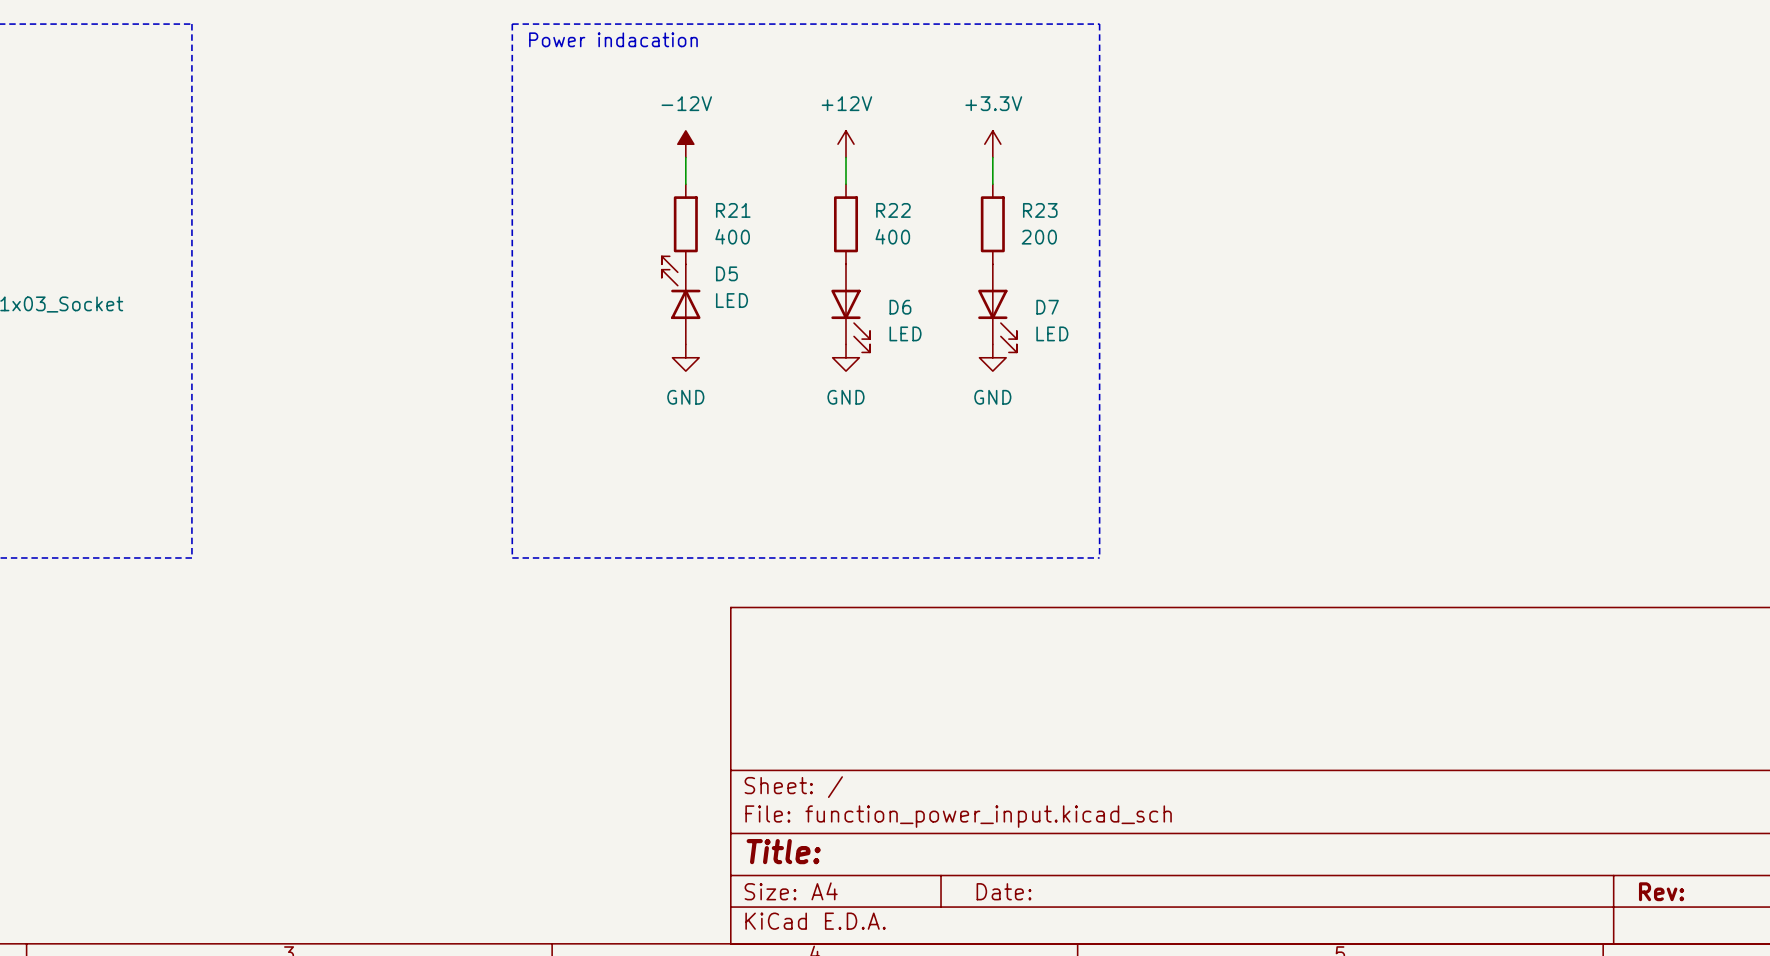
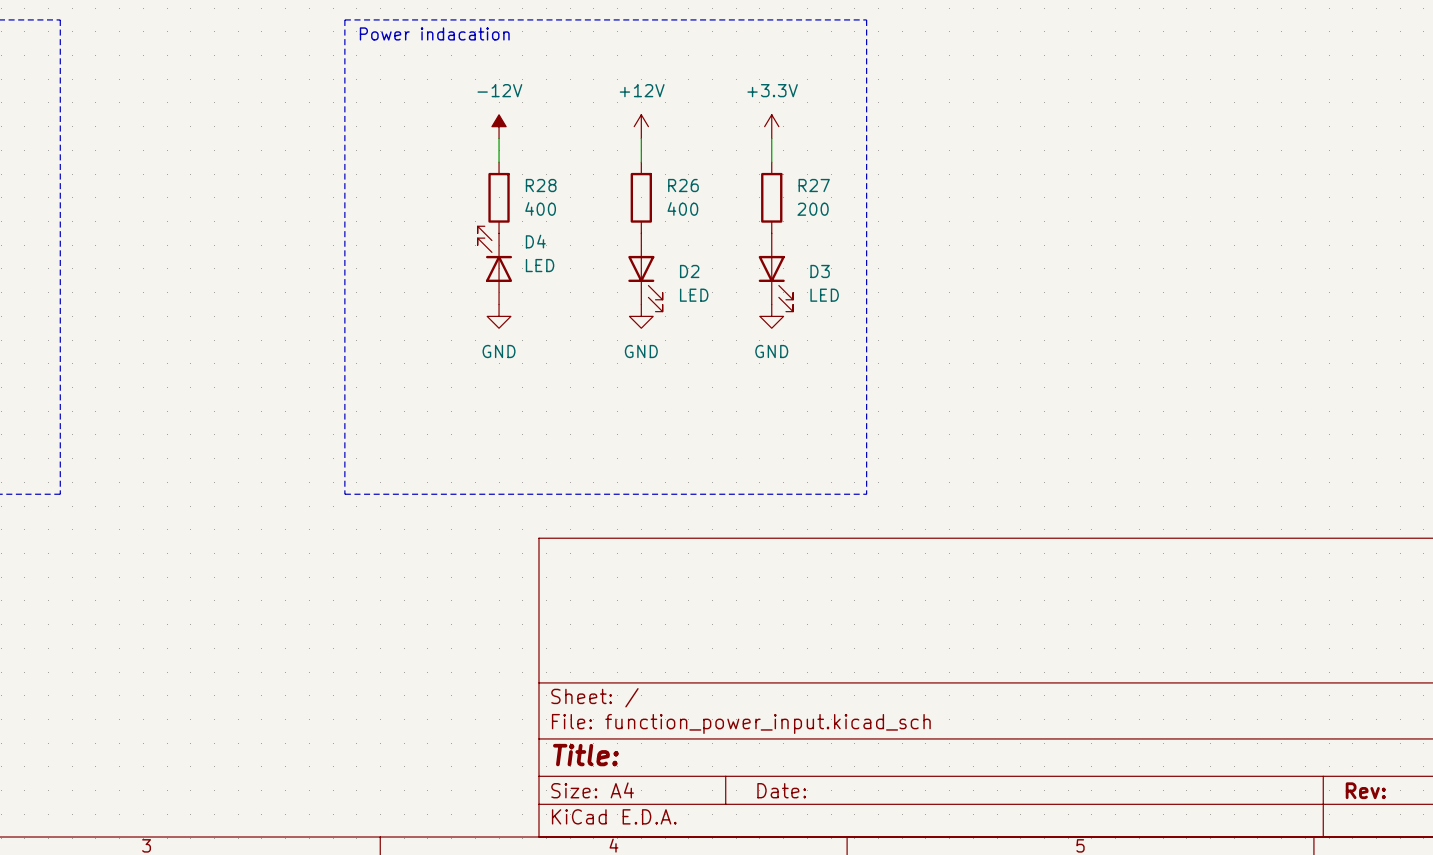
R21 name: R21 (733, 210) -> R28 (541, 185)
R22 name: R22 (893, 210) -> R26 (683, 185)
R23 name: R23 (1040, 210) -> R27 (814, 185)
D5 name: D5 (726, 273) -> D4 (535, 241)
D6 name: D6 (900, 307) -> D2 (689, 271)
D7 name: D7 (1047, 307) -> D3 (820, 271)

